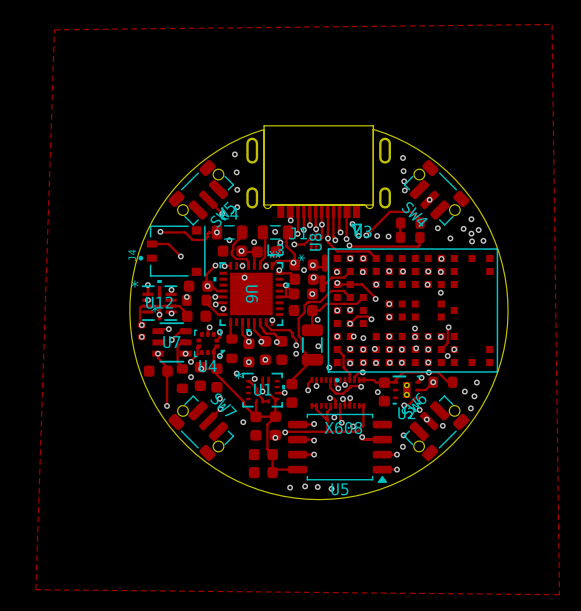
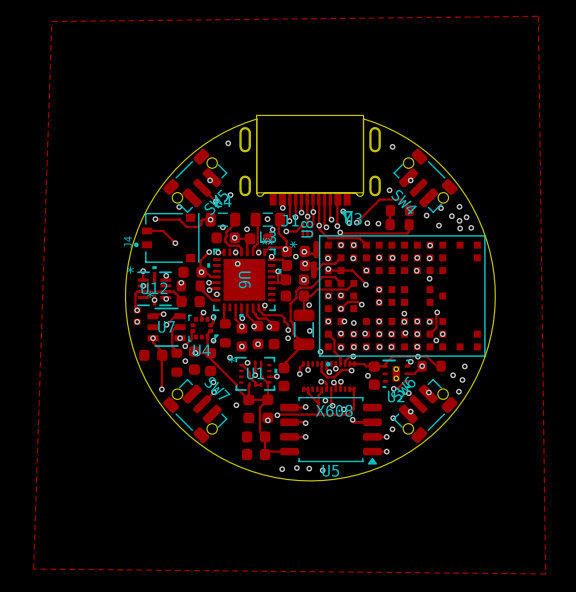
via: (403, 171) -> none
via: (236, 172) -> none
via: (404, 181) -> none
via: (237, 189) -> none
via: (404, 190) -> none
via: none -> (210, 180)
via: none -> (410, 180)
via: (429, 199) -> none
via: none -> (389, 190)
via: none -> (179, 207)
via: none -> (441, 208)
via: none -> (428, 392)
via: (426, 419) -> none
via: (442, 425) -> none
via: none -> (410, 411)

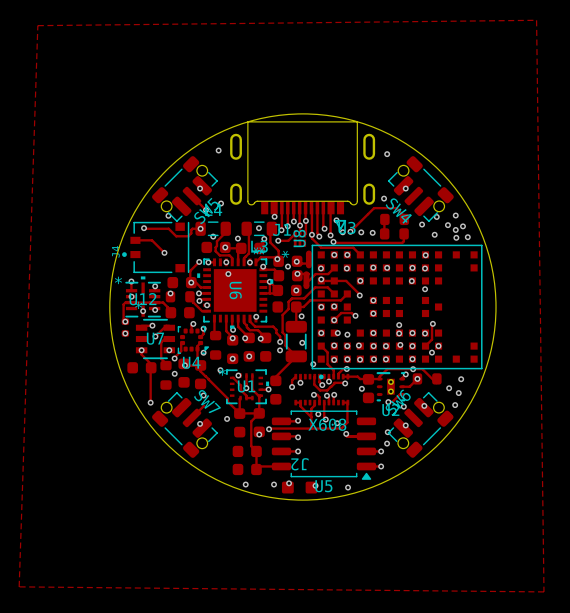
round board edge: none -> [109, 113, 497, 501]
board edge: (363, 192) (363, 118) (396, 132) (426, 152) (452, 177) (466, 196) (477, 217) (486, 239) (492, 263) (495, 286) (494, 310) (491, 334) (484, 357) (475, 379) (456, 409) (431, 435) (402, 456) (369, 471) (334, 479) (298, 480) (263, 474) (229, 462) (199, 443) (172, 419) (151, 390) (136, 358) (127, 323) (125, 287) (130, 251) (142, 218) (154, 197) (168, 177) (193, 152) (223, 132) (256, 119) (256, 192) (363, 192) -> none
via position: (214, 392) -> (200, 423)
via: (309, 468) -> none
via: none -> (245, 484)
J2: none -> (299, 487)
via: none -> (348, 487)

